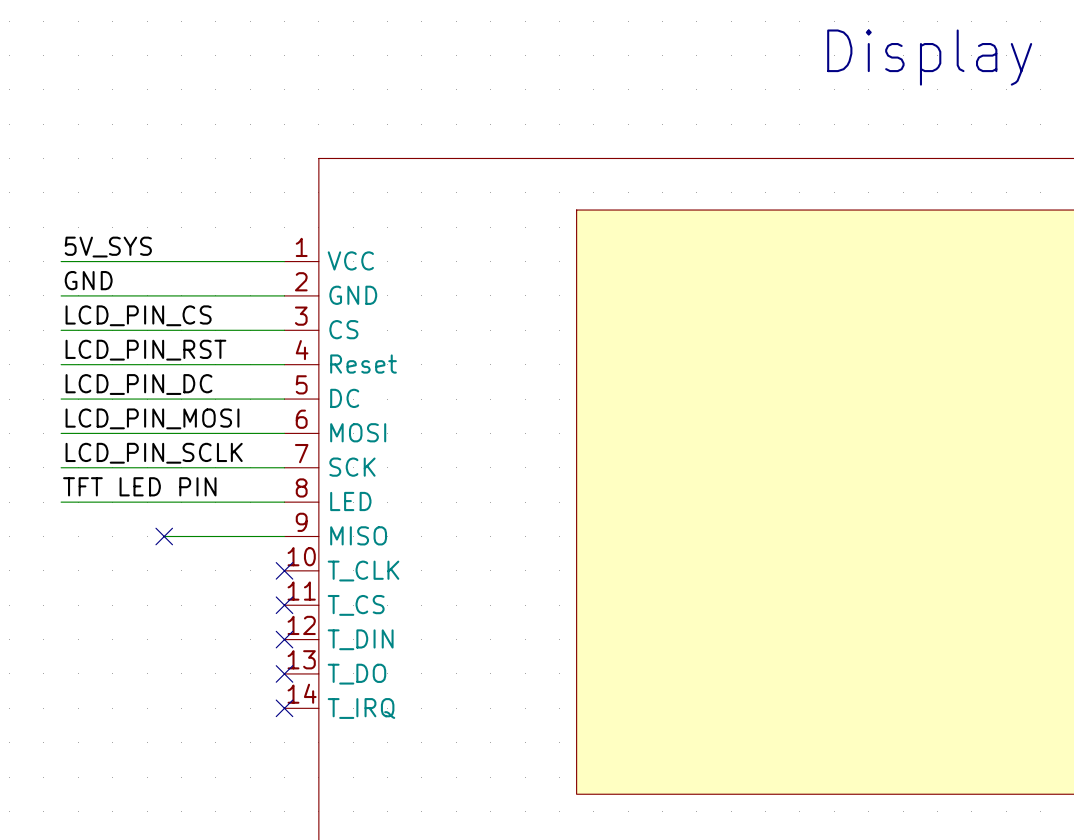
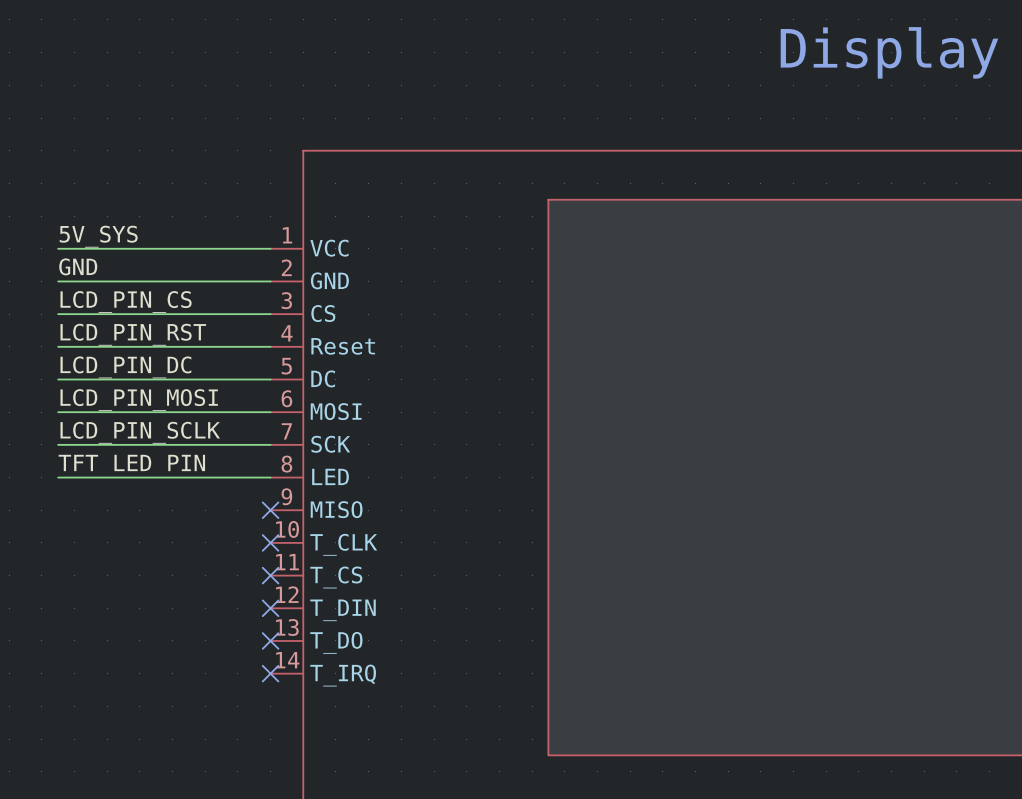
wire: (164, 536) (284, 536) -> none
no-connect mark: (164, 536) -> none
no-connect mark: none -> (270, 510)

